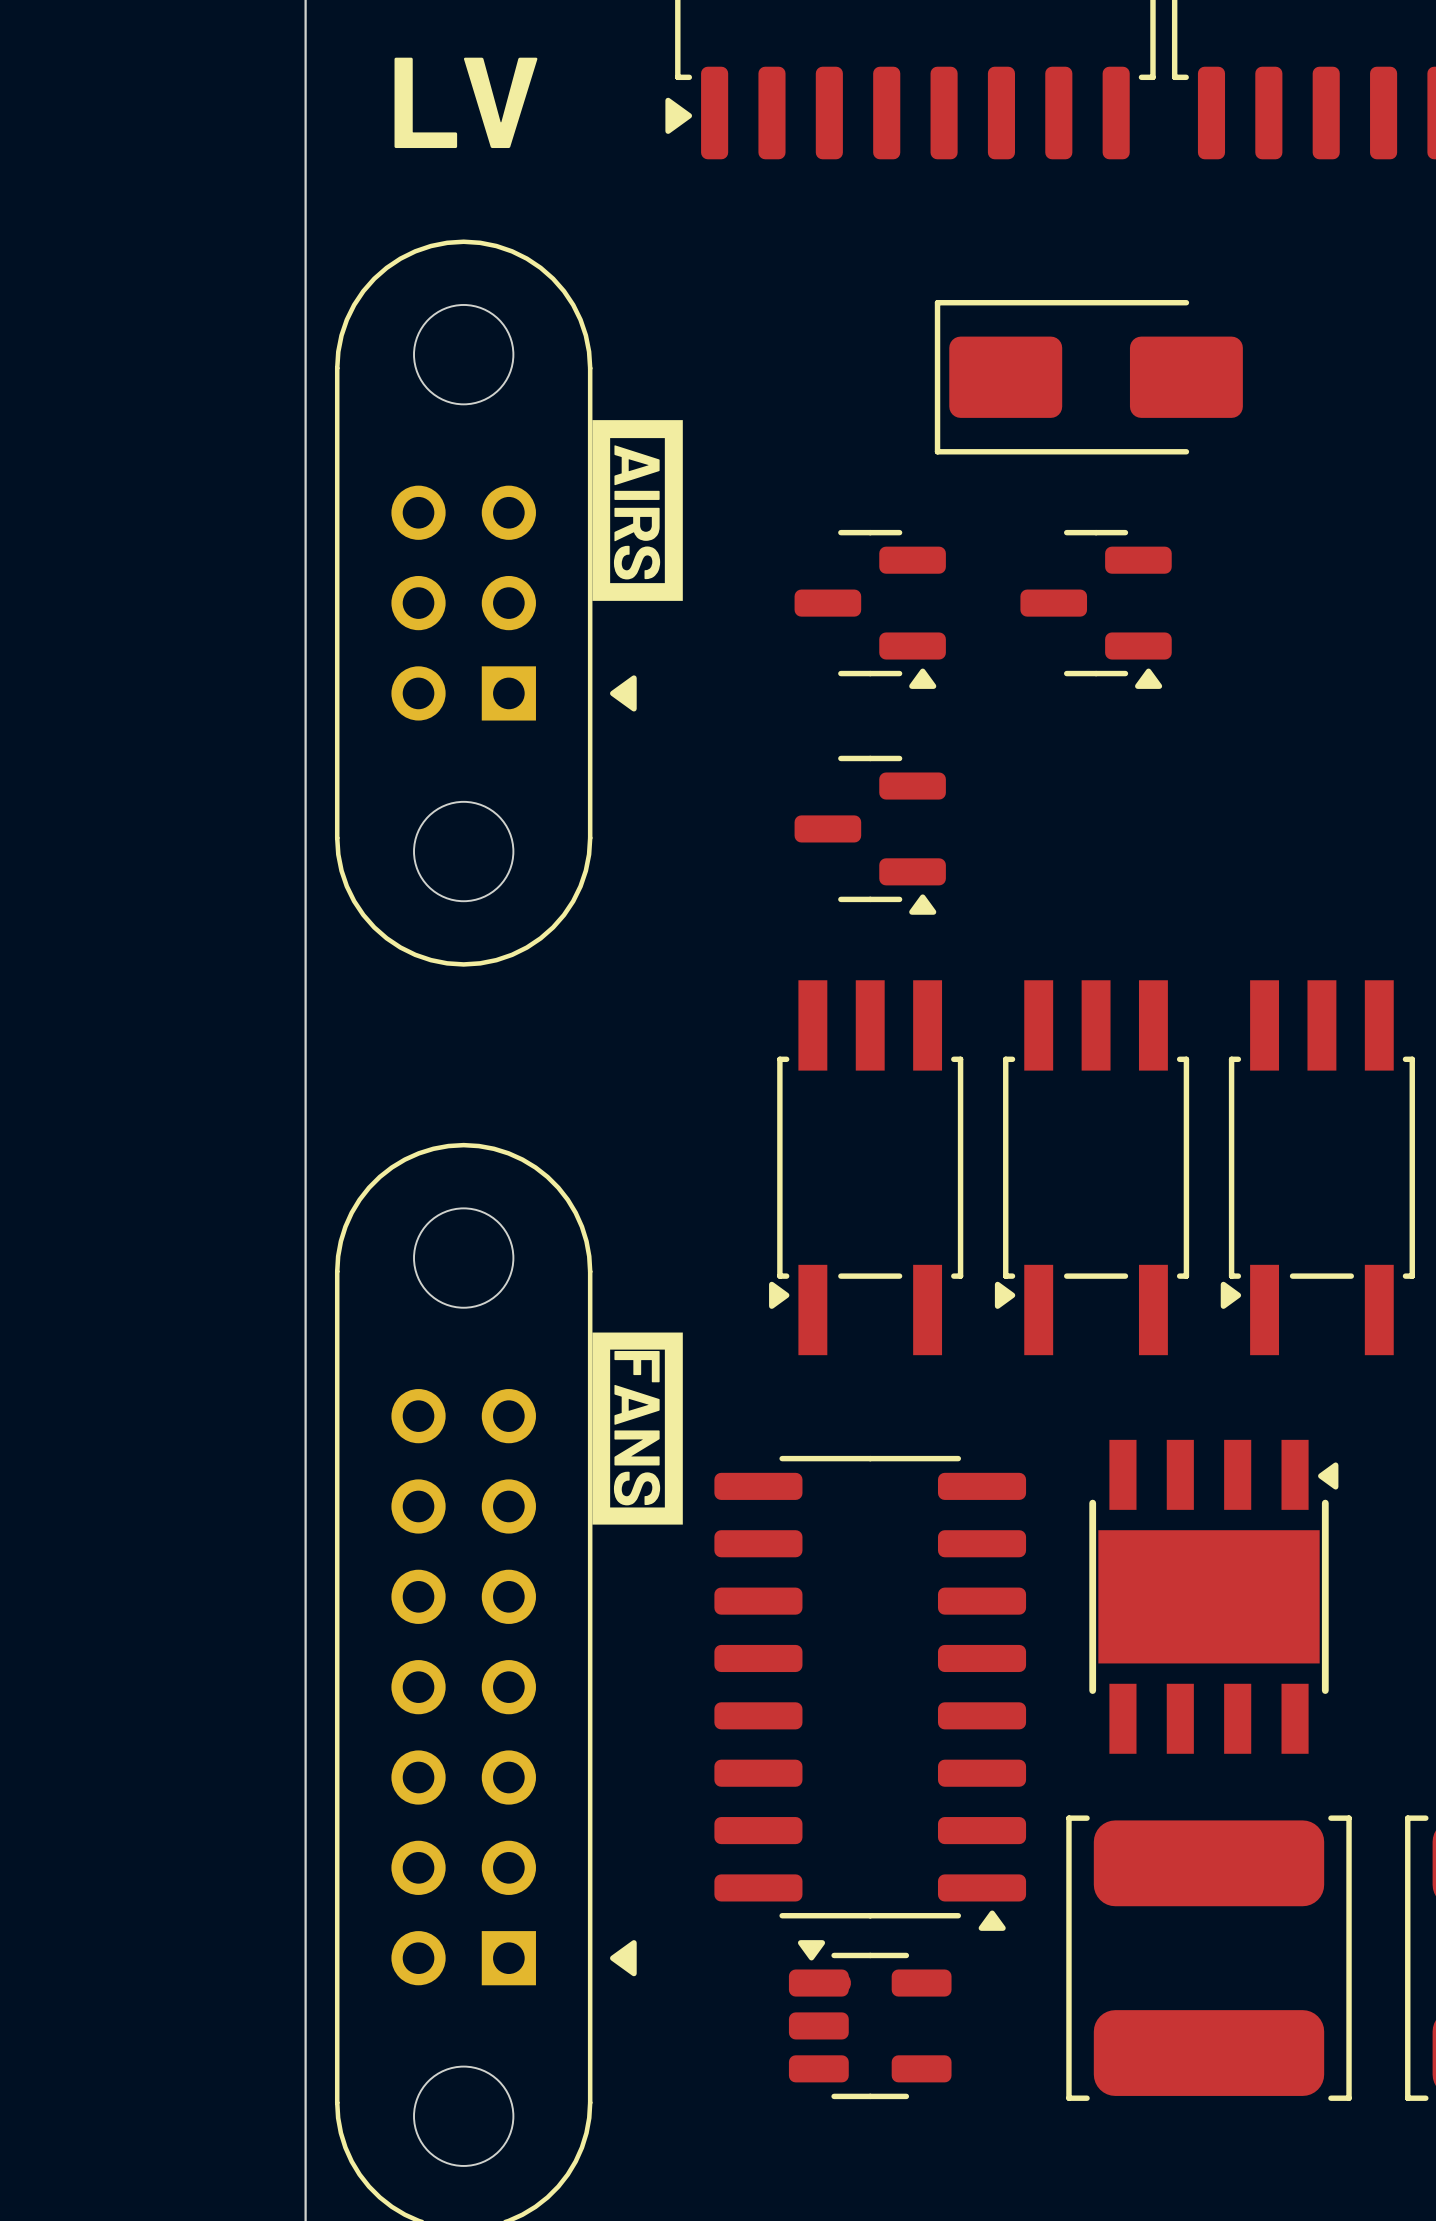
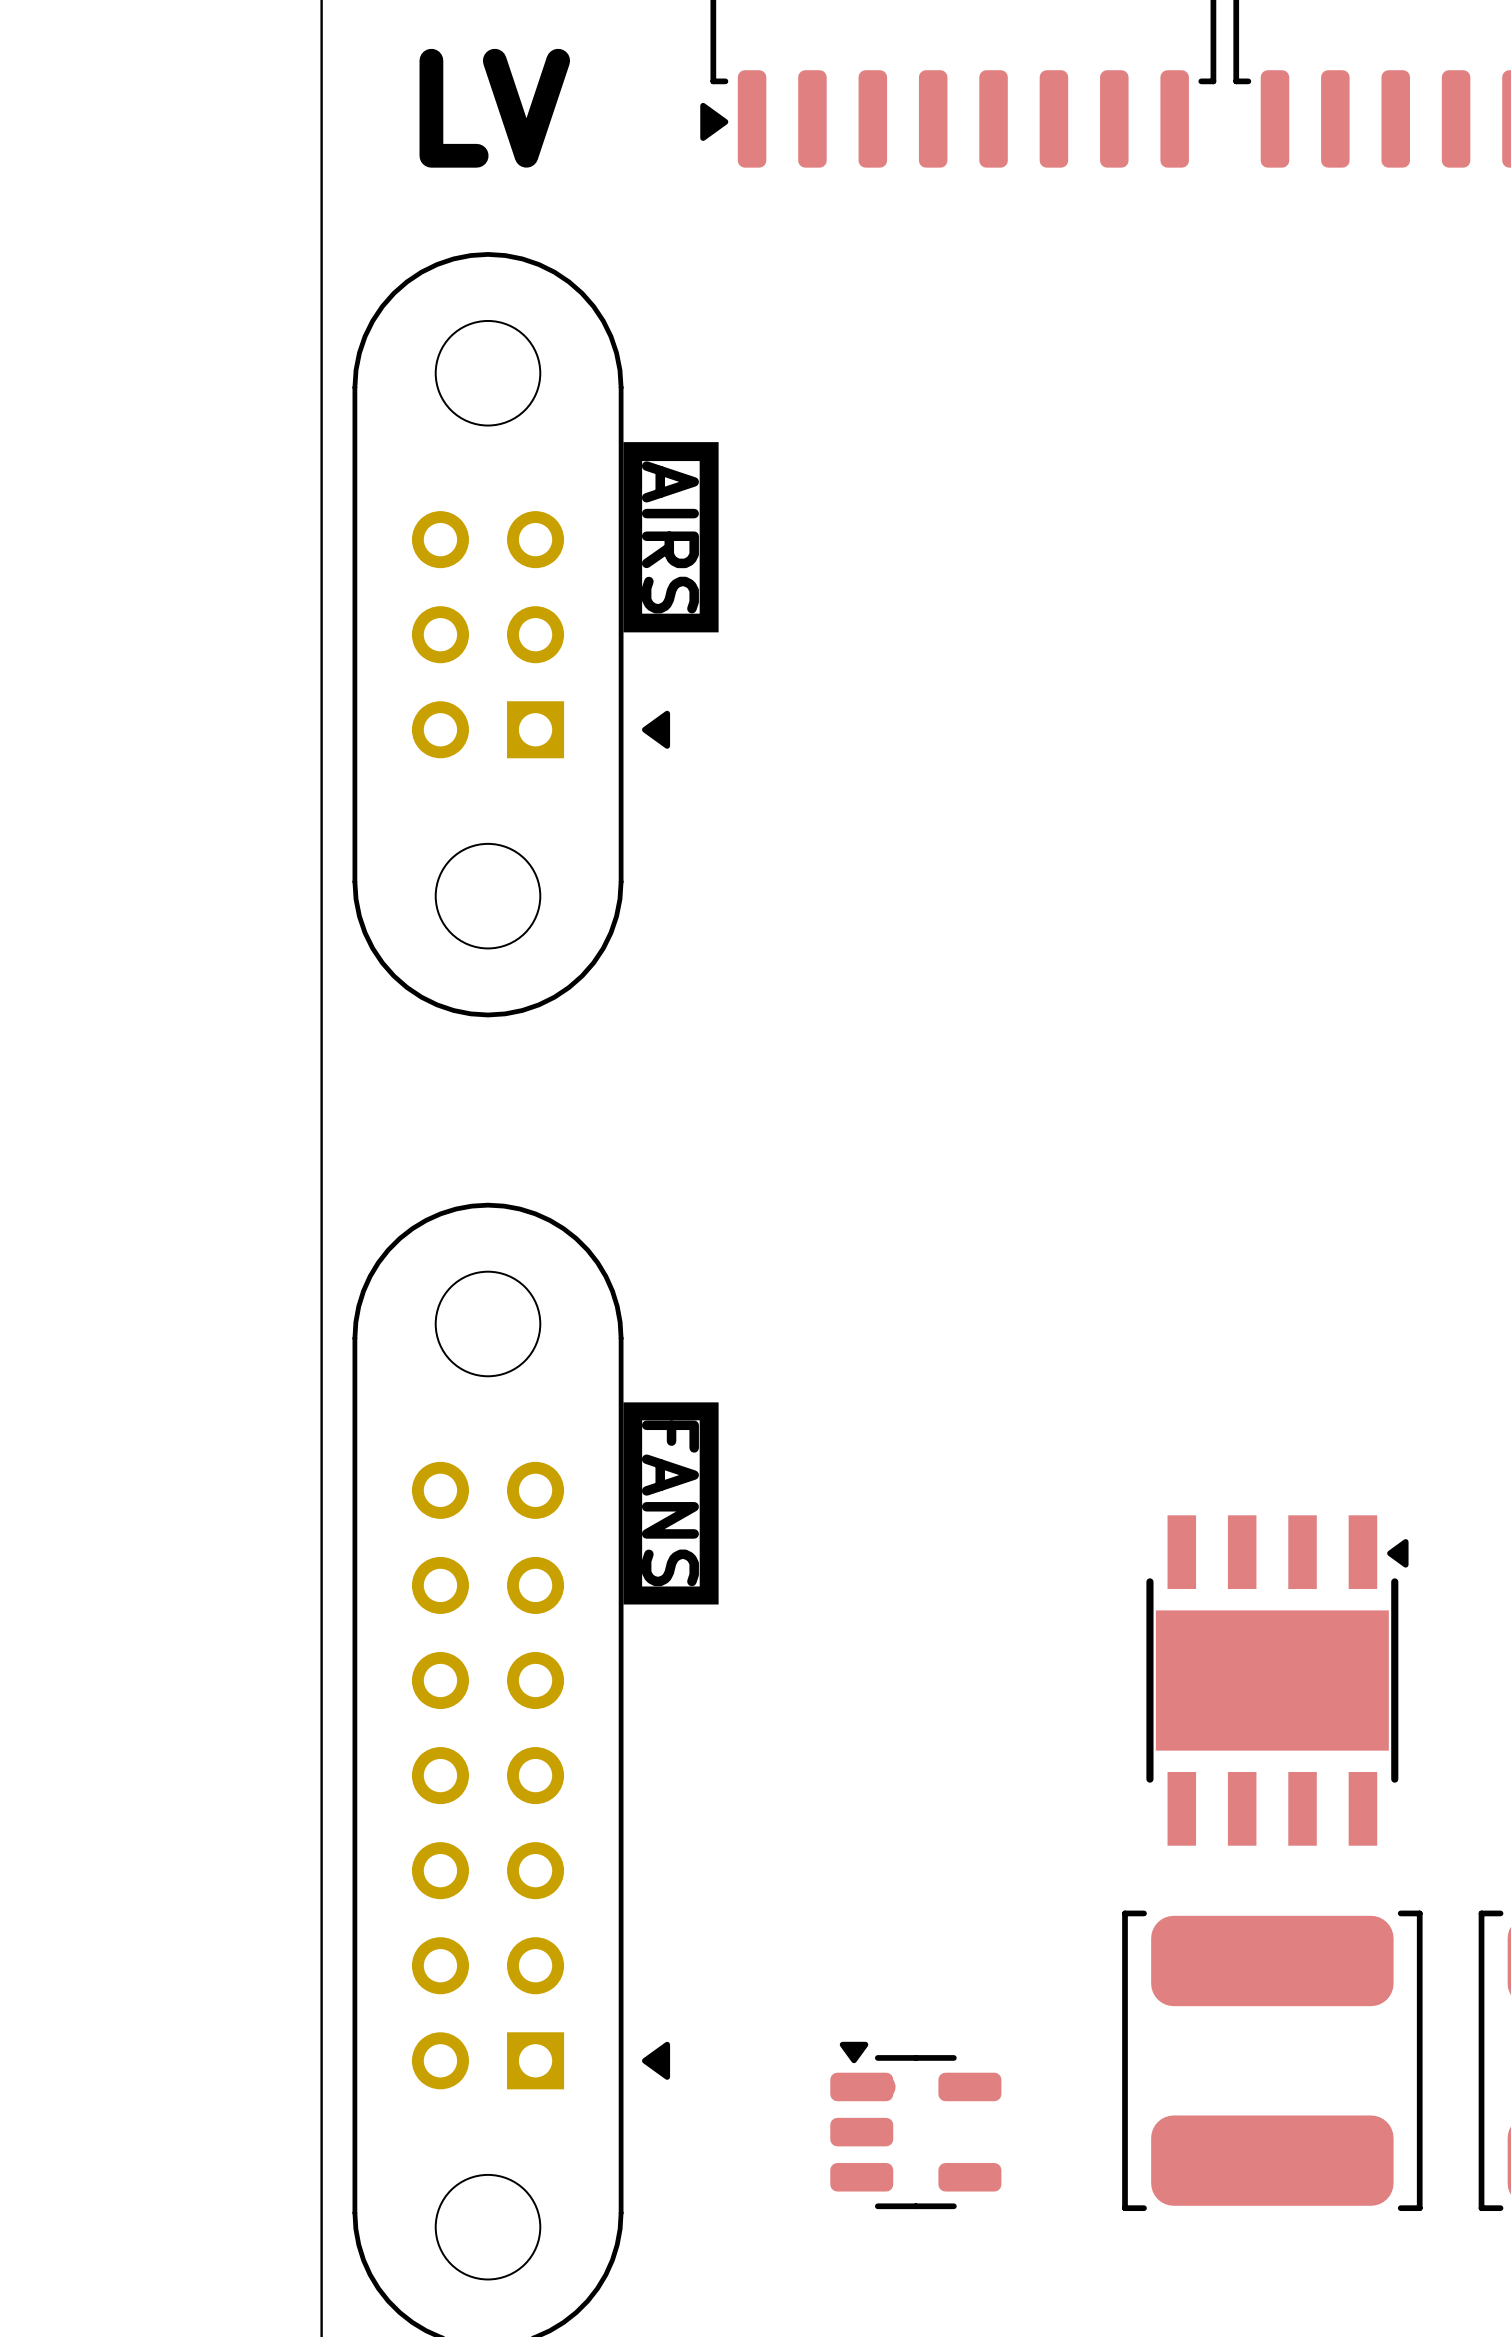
part: (1088, 377) -> none
part: (870, 609) -> none
part: (1096, 609) -> none
part: (870, 835) -> none
part: (866, 1167) -> none
part: (1092, 1167) -> none
part: (1317, 1167) -> none
part: (870, 1693) -> none

